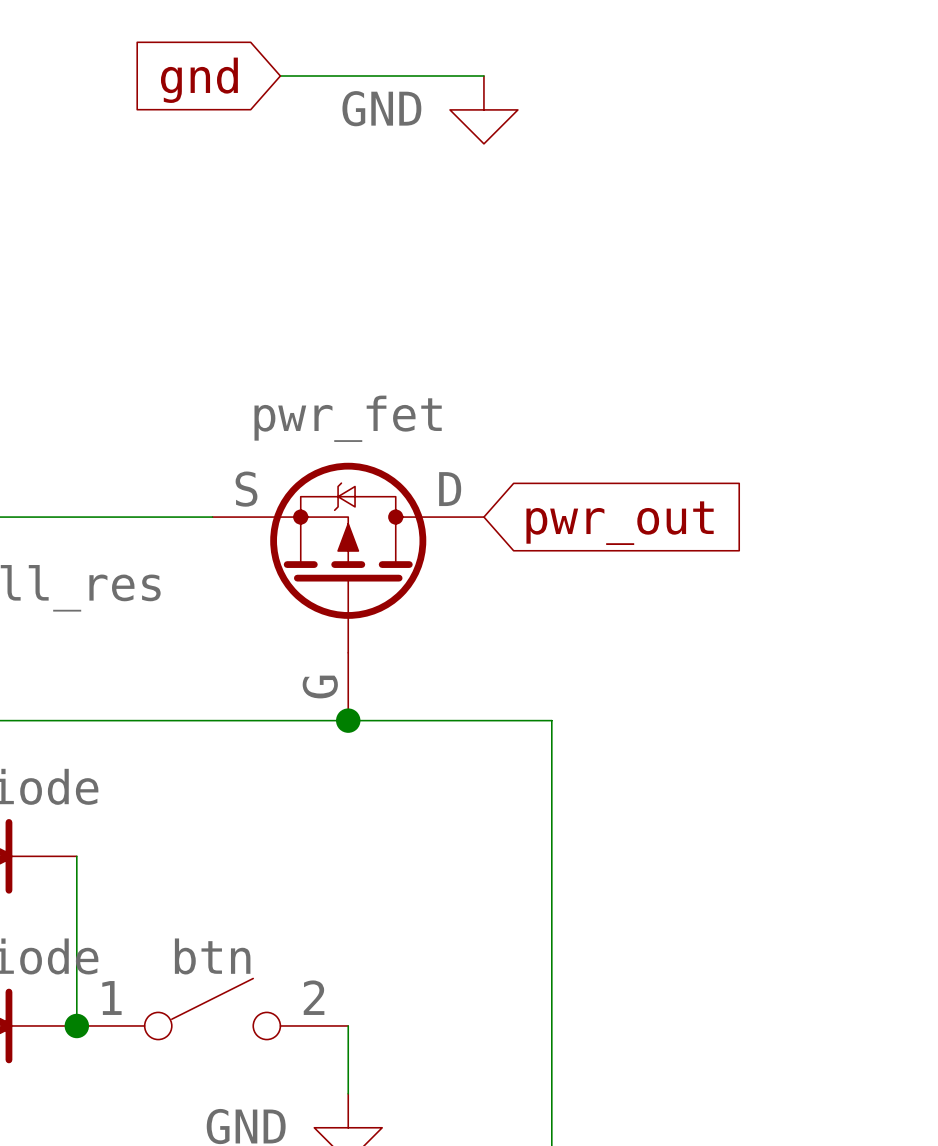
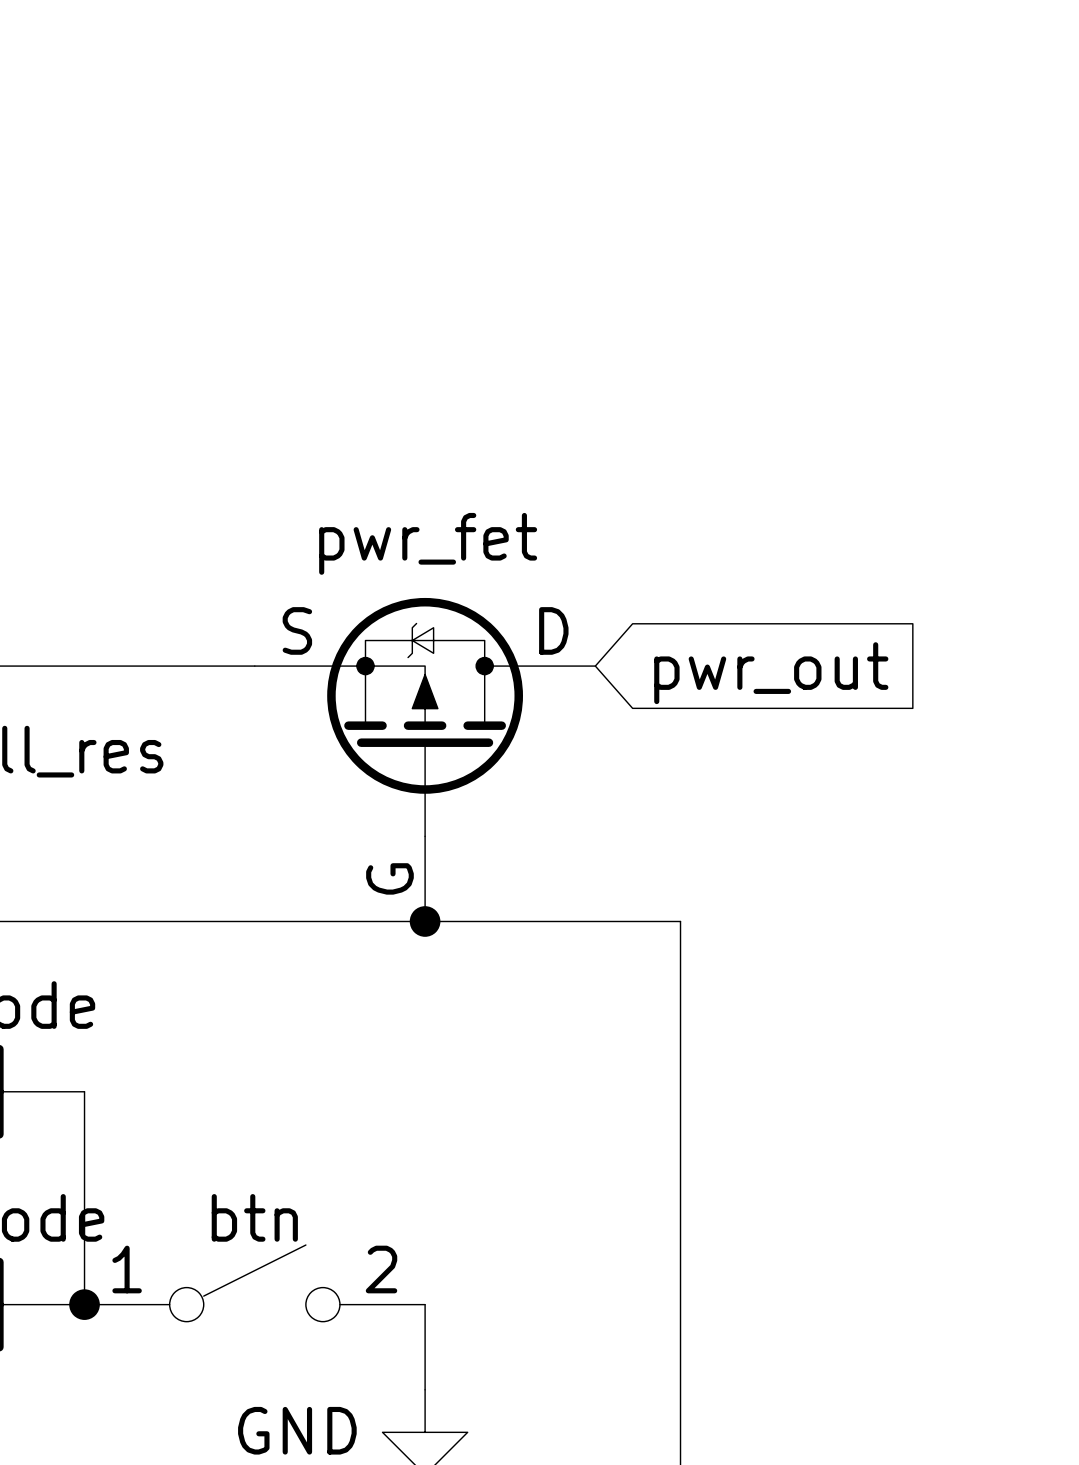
wire: (280, 76) (483, 76) -> none
global label: gnd (199, 80) -> none
power symbol: GND (483, 109) -> none

